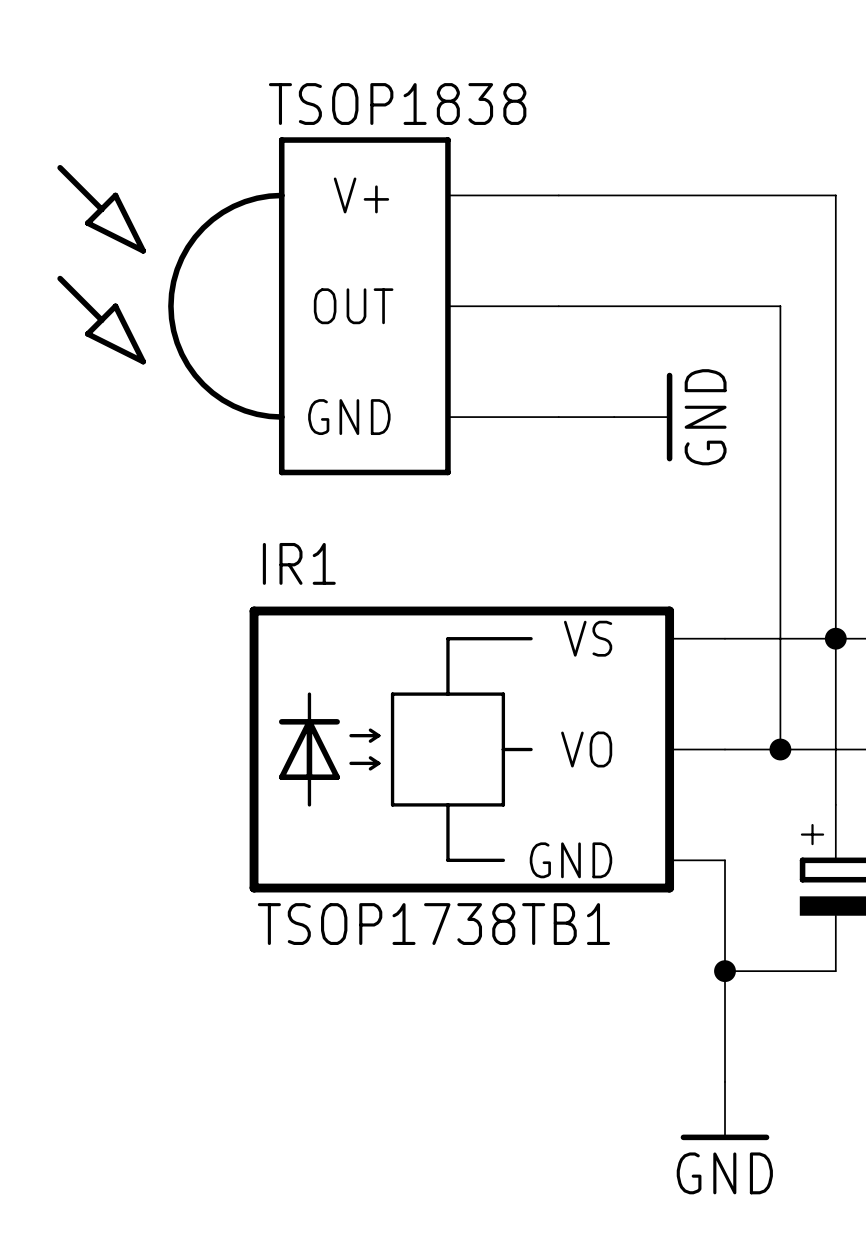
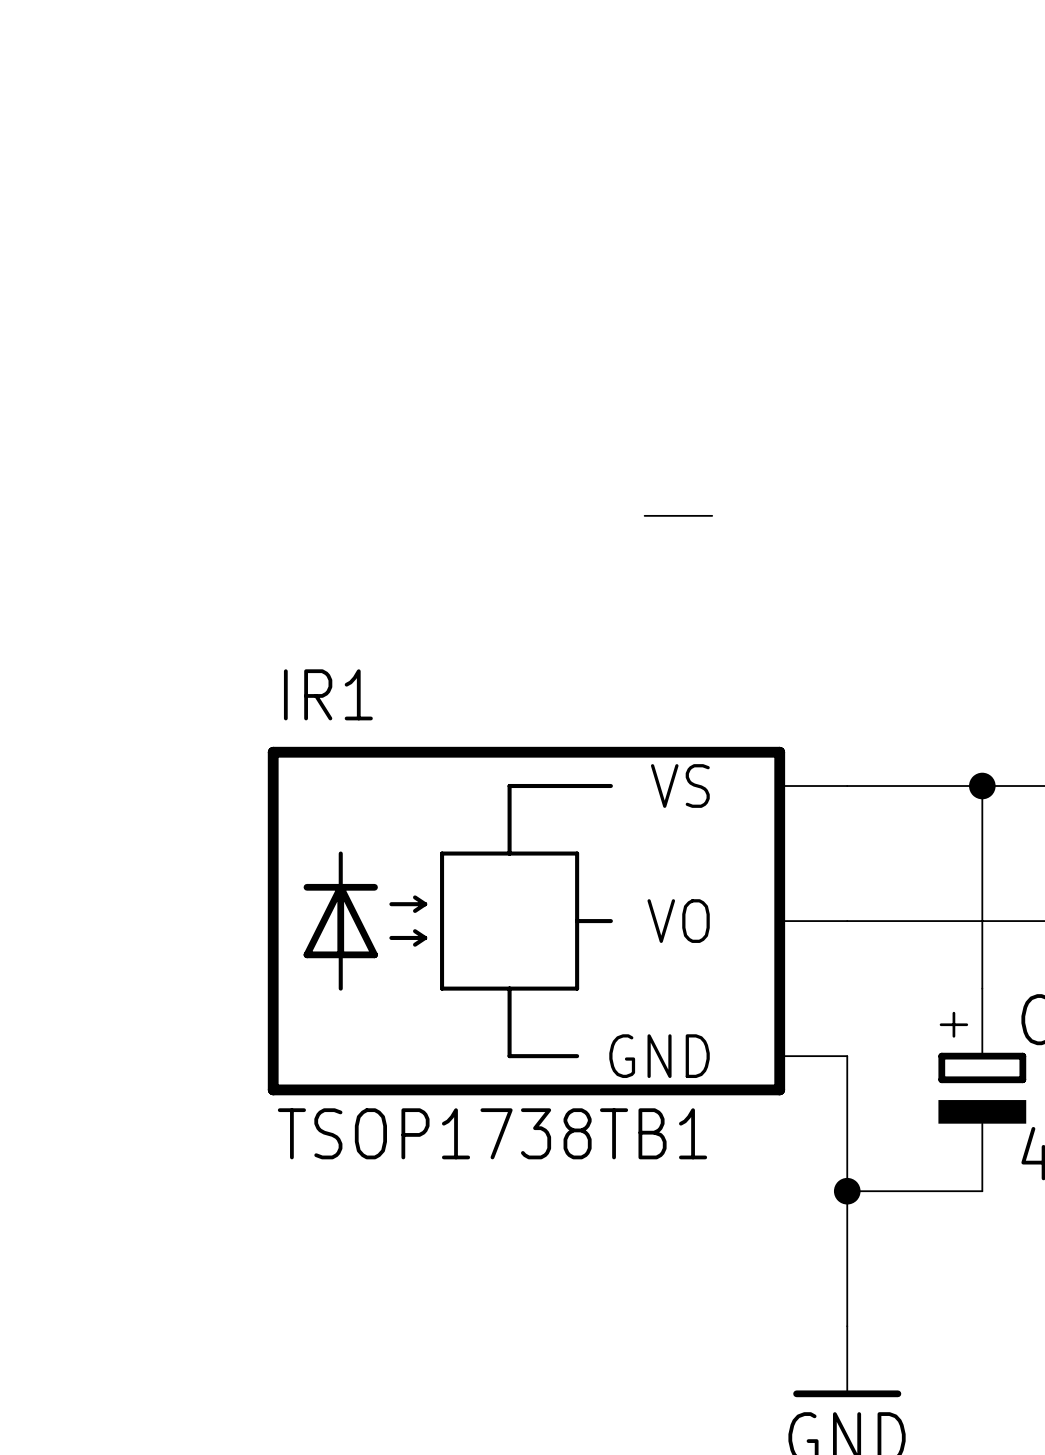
wire: (558, 195) (835, 195) (835, 638) -> none
part: TSOP1838 (308, 306) -> none
wire: (558, 306) (780, 306) (780, 749) -> none
power symbol: GND (643, 417) -> none
junction: (780, 749) -> none

